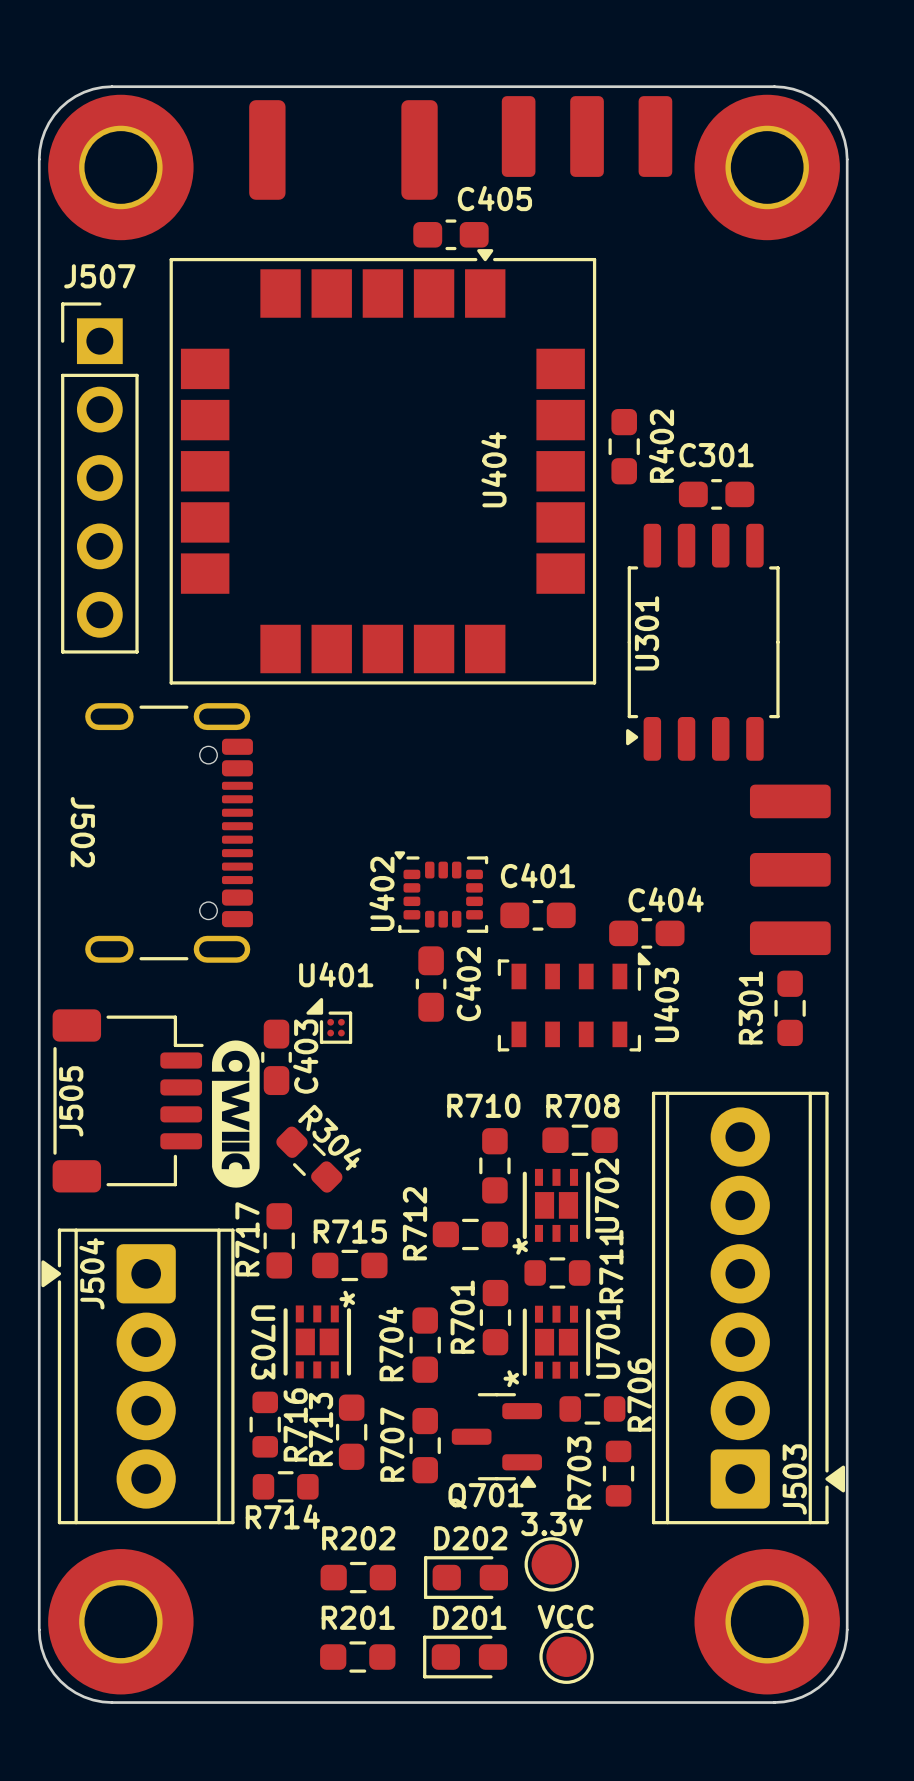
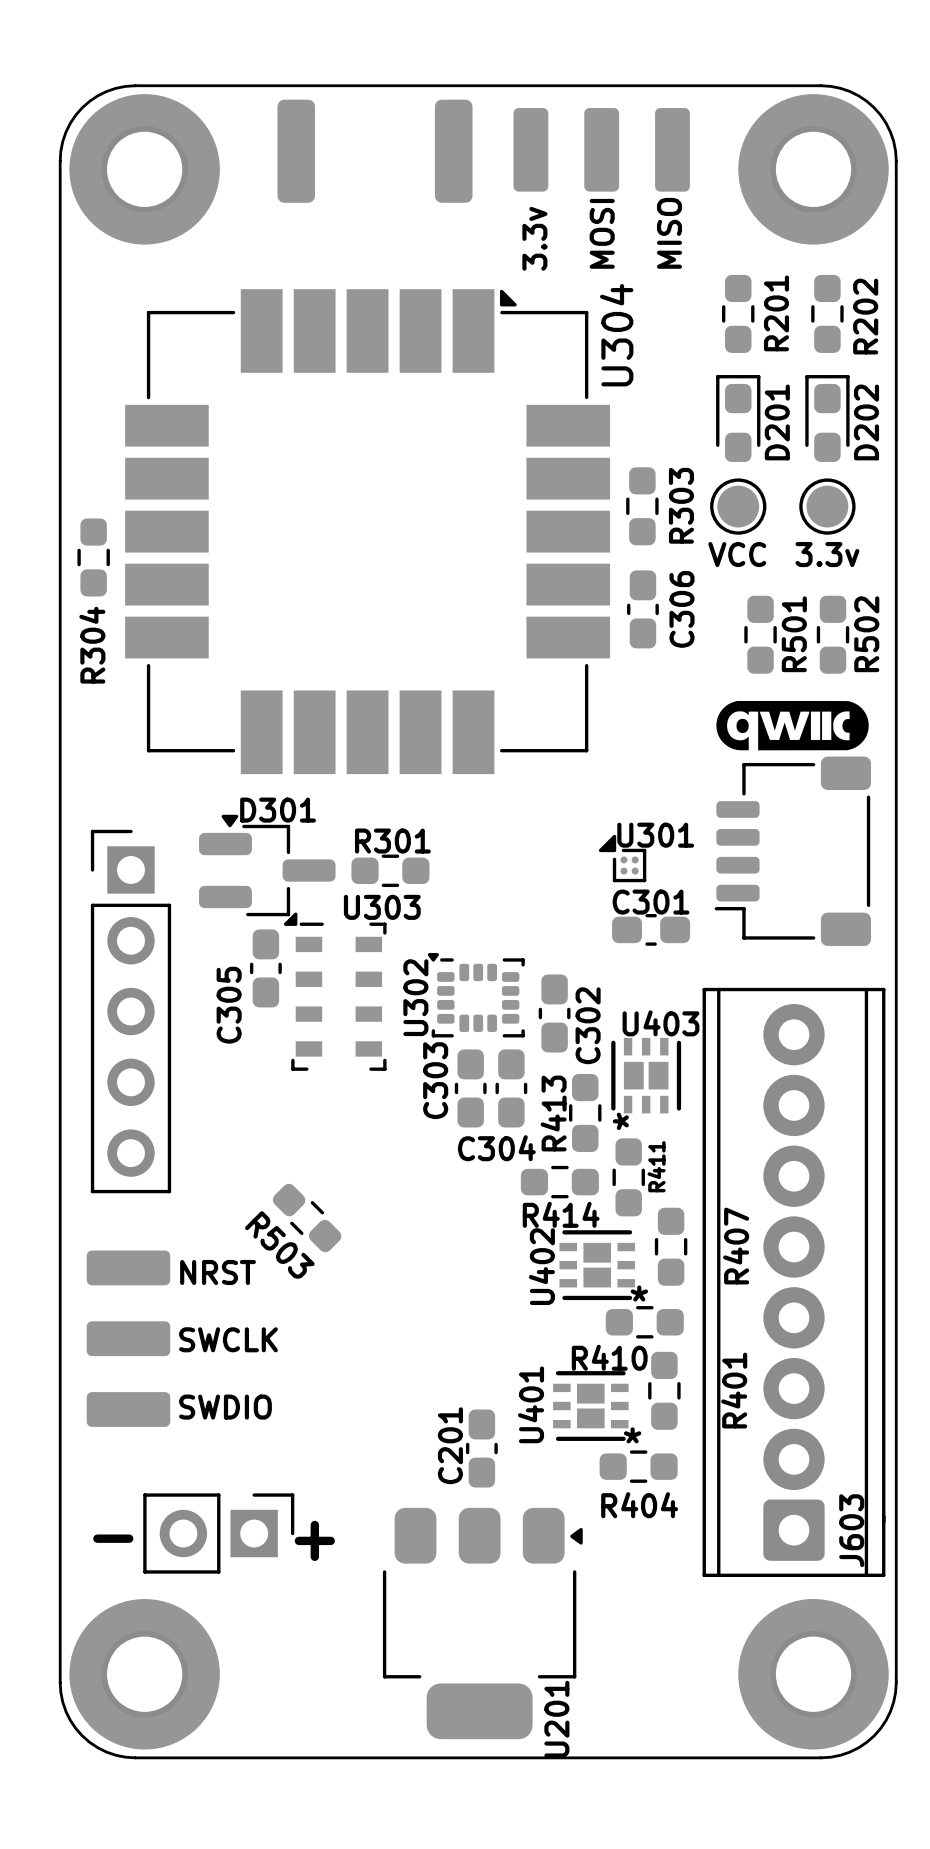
part position: (587, 136) -> (601, 149)
text: none -> MOSI (602, 233)
text: none -> MISO (669, 233)
C405: (450, 234) -> none
text: none -> 3.3v (534, 238)
R402: (624, 446) -> none
C301 name position: C301 (716, 455) -> C301 (651, 902)
U404: (382, 466) -> none
J507: (99, 477) -> none
R303: none -> (642, 506)
part: none -> VCC (738, 506)
part: none -> 3.3v (827, 506)
C301 position: (716, 494) -> (651, 929)
U304: none -> (367, 531)
U301 footprint: [626, 523, 780, 761] -> [598, 834, 647, 883]
C306: none -> (642, 609)
R501: none -> (760, 634)
R502: none -> (833, 634)
U301 name position: U301 (647, 633) -> U301 (655, 835)
drawing: none -> [716, 700, 869, 751]
part: none -> (792, 851)
J502: (169, 832) -> none
D301: none -> (267, 865)
U402 footprint: [394, 851, 489, 933] -> [559, 1230, 635, 1301]
part: (790, 869) -> none
C401: (538, 915) -> none
C404: (646, 933) -> none
C305: none -> (265, 968)
U403 footprint: [497, 952, 651, 1052] -> [611, 1037, 682, 1114]
U303: none -> (335, 991)
U302: none -> (476, 995)
U401 name position: U401 (336, 974) -> U401 (531, 1404)
part: none -> (130, 1011)
C302: none -> (554, 1013)
C402: (431, 984) -> none
U401 footprint: [306, 998, 353, 1044] -> [553, 1371, 629, 1441]
U403 name position: U403 (666, 1004) -> U403 (660, 1023)
R301 rotation: 0° (790, 1008) -> 90° clockwise (390, 870)
R301 position: (790, 1008) -> (390, 870)
drawing: [211, 1040, 260, 1188] -> none
C303: none -> (470, 1088)
C304: none -> (511, 1088)
C403: (276, 1057) -> none
R413: none -> (585, 1112)
J505: (128, 1100) -> none
R304 name position: R304 (329, 1137) -> R304 (92, 645)
R708: (580, 1140) -> none
R411: none -> (628, 1177)
R414: none -> (559, 1182)
R304 rotation: 0° (309, 1159) -> 45° clockwise (93, 557)
R304 position: (309, 1159) -> (93, 557)
R710: (494, 1165) -> none
R503: none -> (307, 1218)
U702: (556, 1205) -> none
R407: none -> (671, 1246)
text: none -> NRST (218, 1272)
R712: (470, 1234) -> none
R717: (279, 1240) -> none
J603: none -> (793, 1282)
R715: (349, 1265) -> none
R711: (557, 1272) -> none
R410: none -> (644, 1322)
part: none -> (128, 1338)
text: none -> SWCLK (228, 1339)
J503: (748, 1308) -> none
R701: (495, 1317) -> none
U703: (317, 1341) -> none
U701: (556, 1342) -> none
R704: (425, 1345) -> none
R401: none -> (664, 1390)
text: none -> SWDIO (225, 1407)
J504: (137, 1376) -> none
C201: none -> (481, 1448)
R706: (592, 1408) -> none
R404: none -> (638, 1466)
R716: (265, 1424) -> none
R713: (351, 1432) -> none
Q701: (496, 1440) -> none
R707: (425, 1445) -> none
R703: (618, 1473) -> none
part: none -> (218, 1533)
R714: (285, 1486) -> none
text: none -> - (113, 1538)
text: none -> + (314, 1540)
part: 3.3v (551, 1564) -> none
U201: none -> (482, 1623)
R202 rotation: 0° (358, 1577) -> 90° clockwise (827, 313)
R202 position: (358, 1577) -> (827, 313)
D202 rotation: 0° (465, 1577) -> 90° clockwise (827, 418)
D202 position: (465, 1577) -> (827, 418)
part: VCC (566, 1656) -> none
R201 rotation: 0° (357, 1657) -> 90° clockwise (738, 313)
R201 position: (357, 1657) -> (738, 313)
D201 rotation: 0° (465, 1657) -> 90° clockwise (738, 418)
D201 position: (465, 1657) -> (738, 418)

